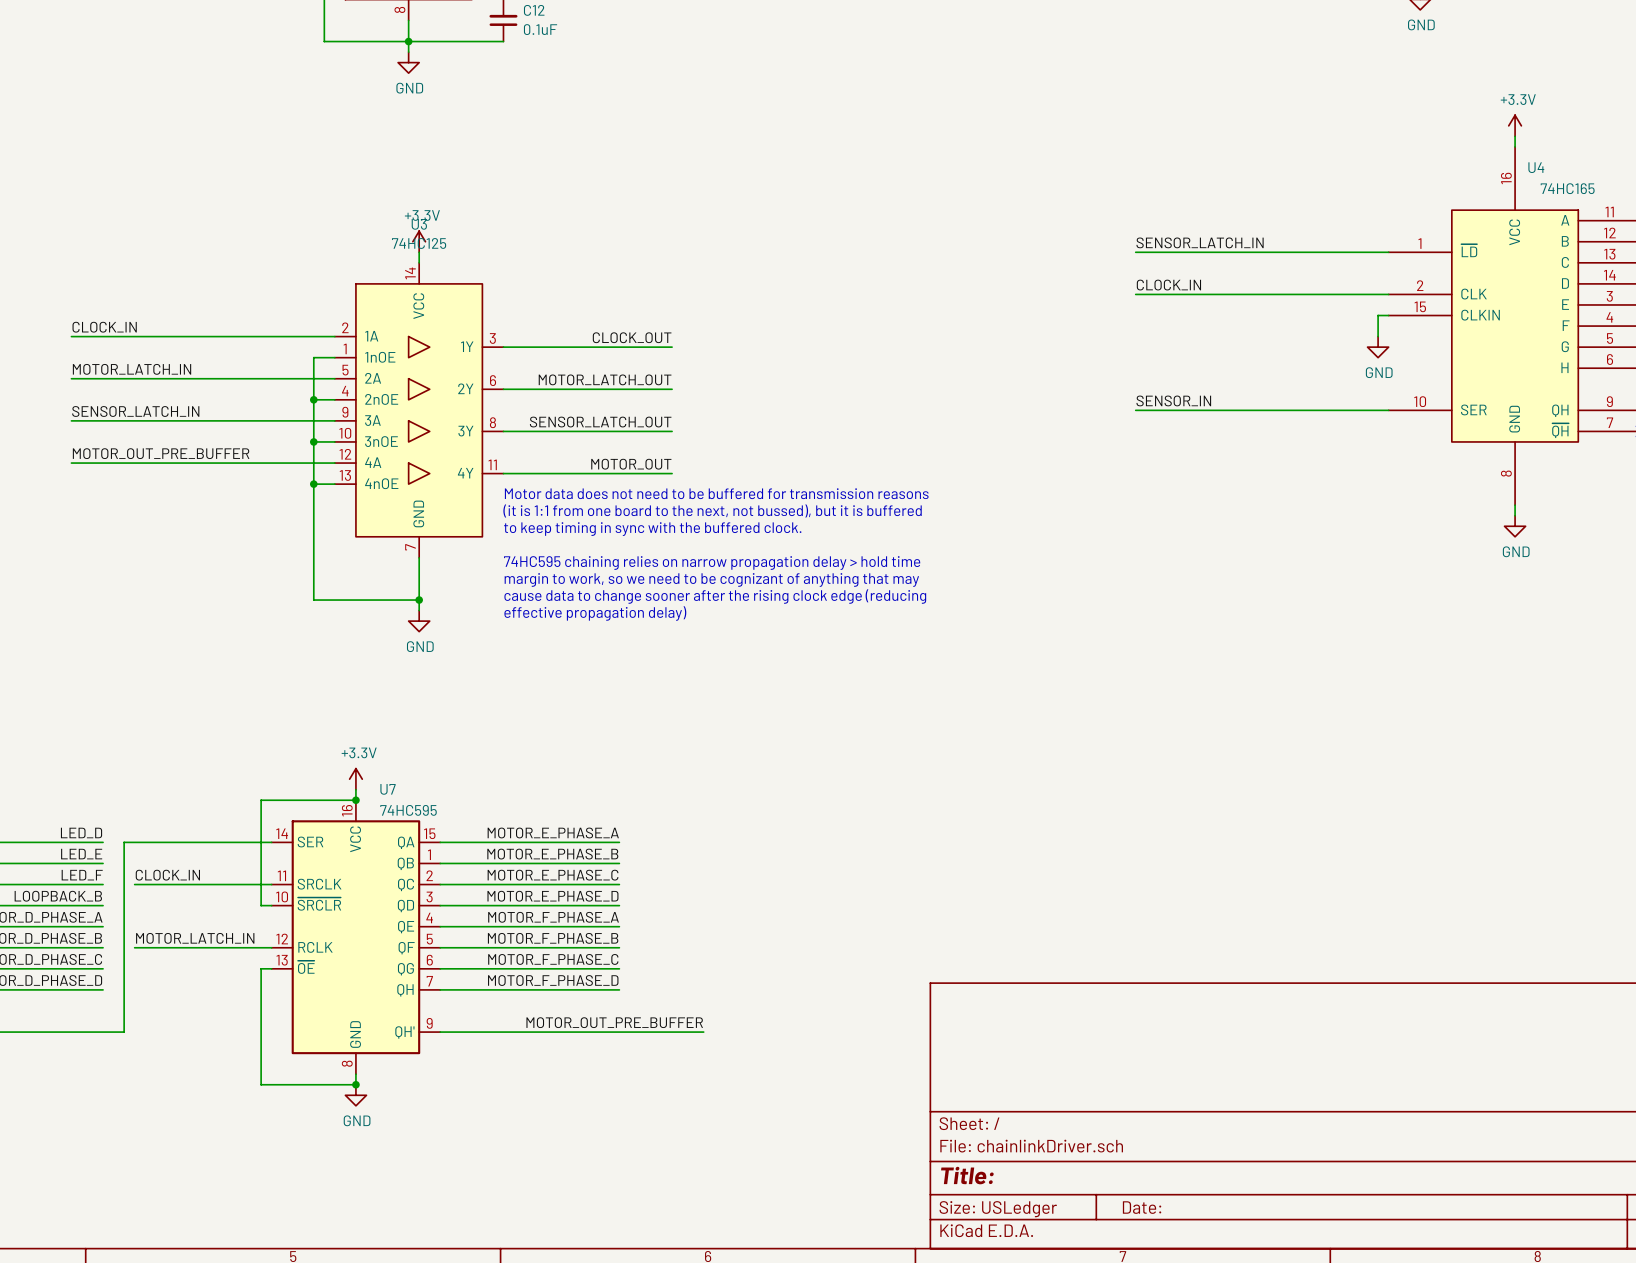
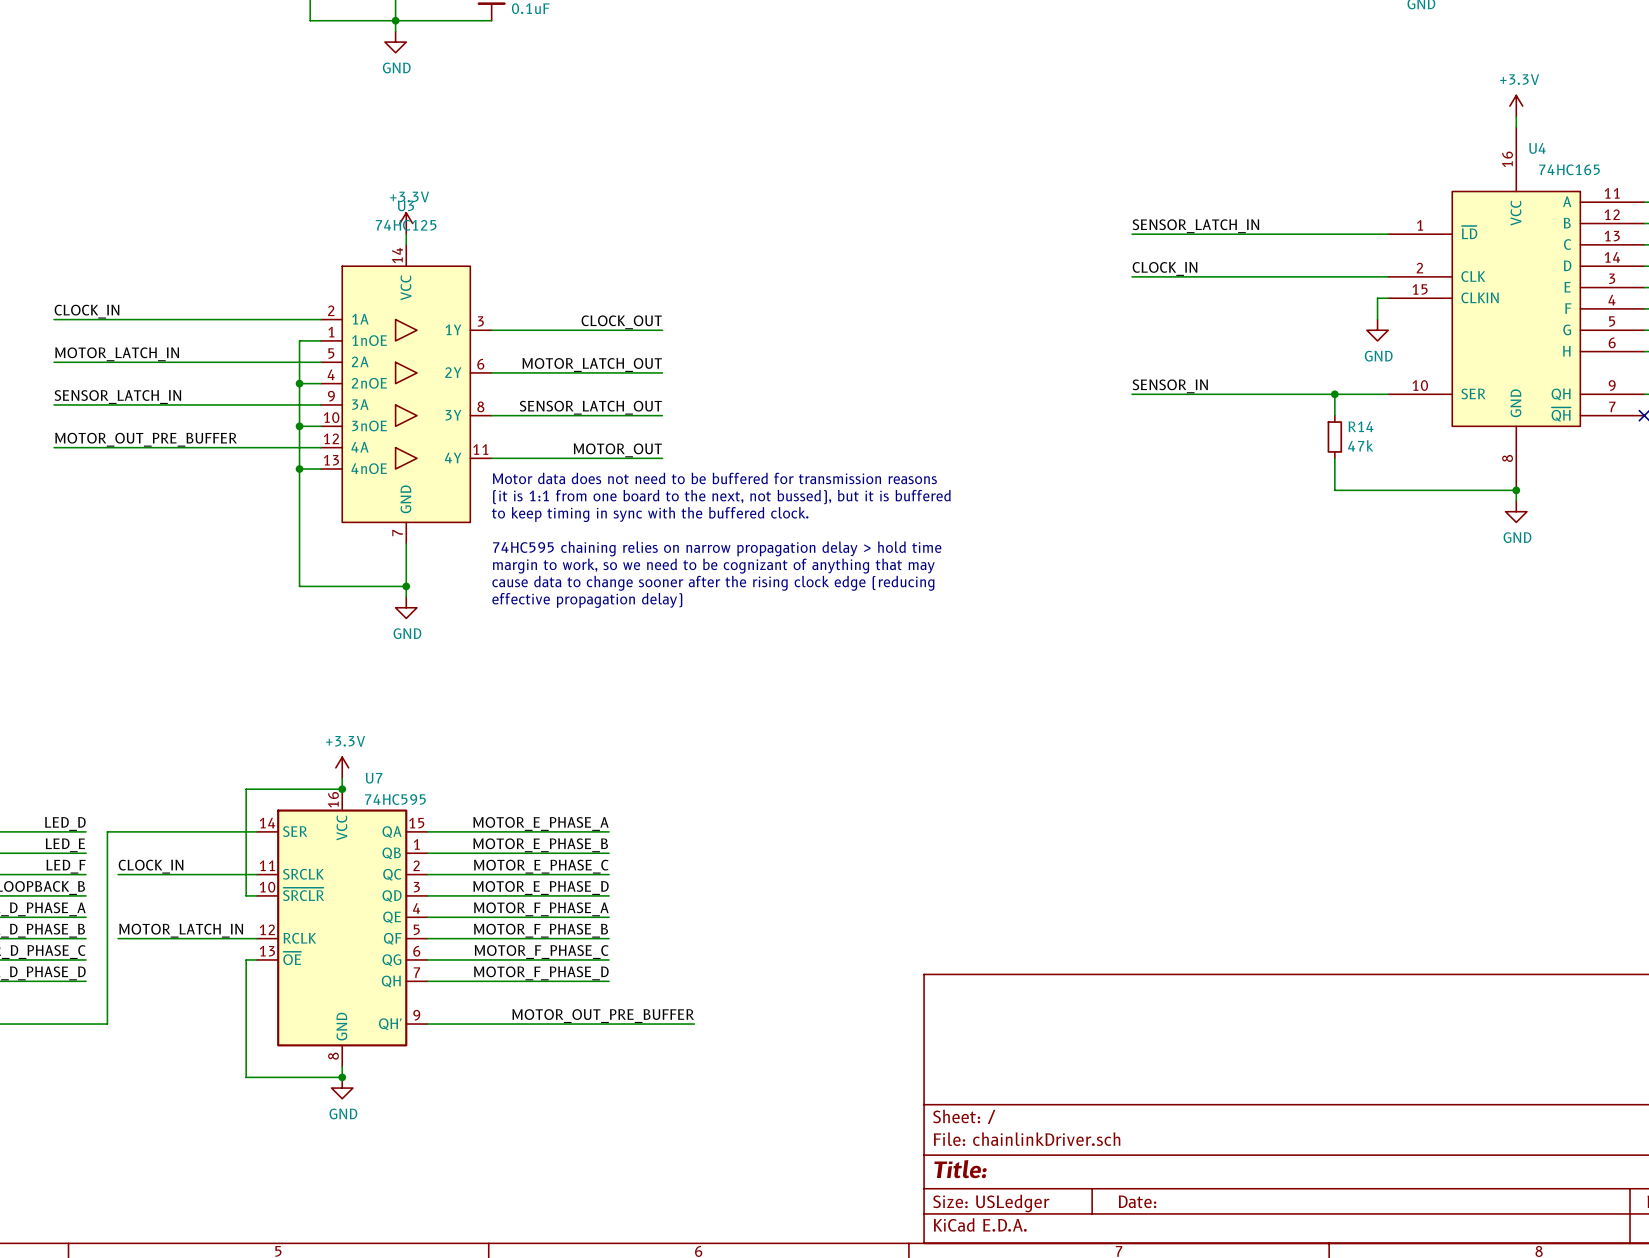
wire: none -> (1334, 394) (1334, 415)
junction: none -> (1334, 394)
R14: none -> 47k (1334, 436)
wire: none -> (1334, 458) (1334, 490) (1516, 490)
junction: none -> (1516, 490)

